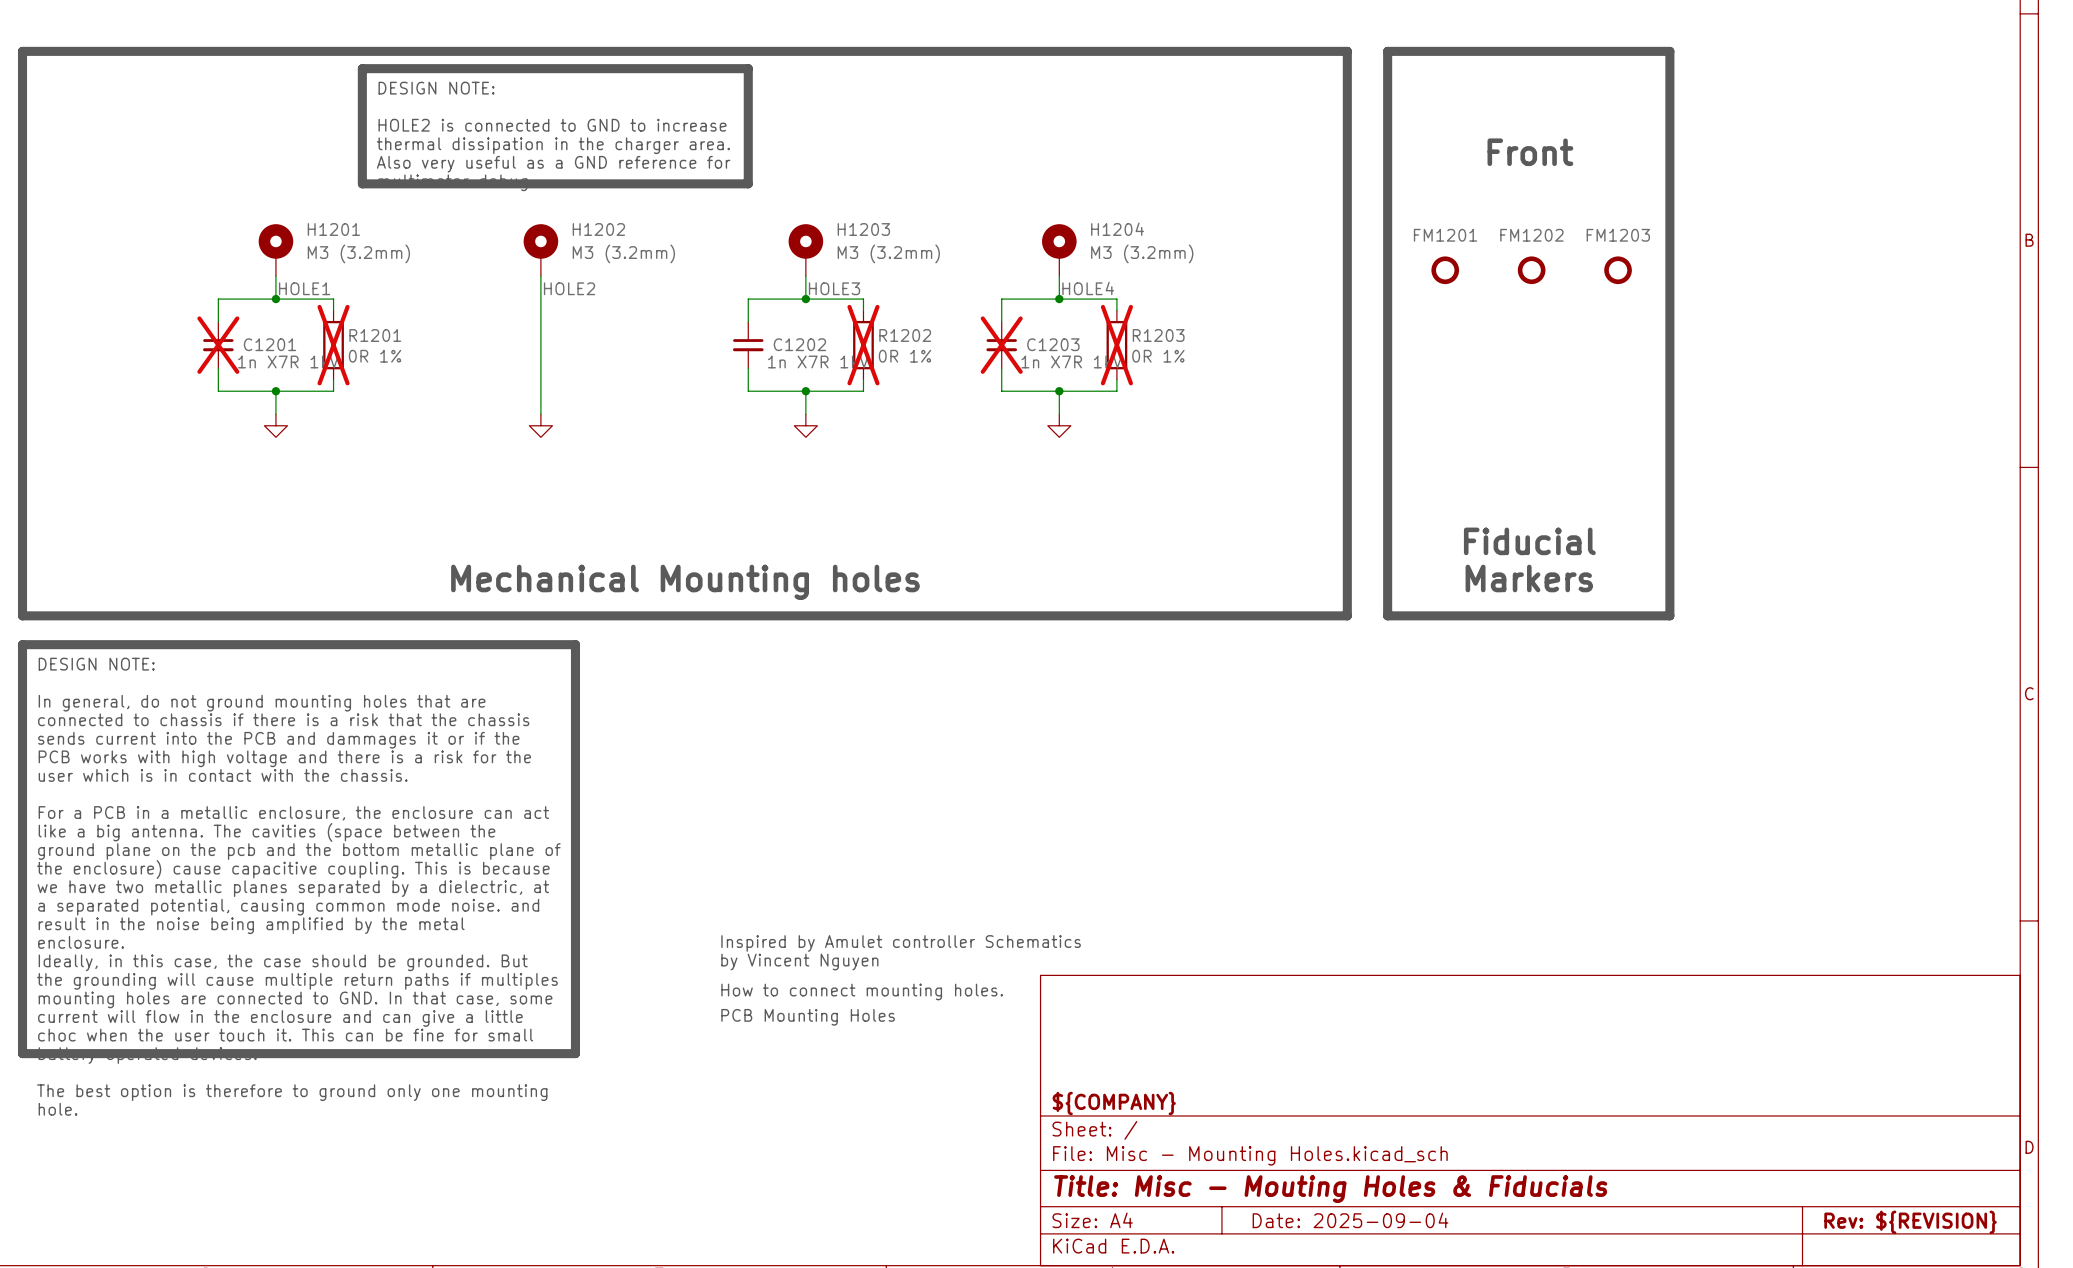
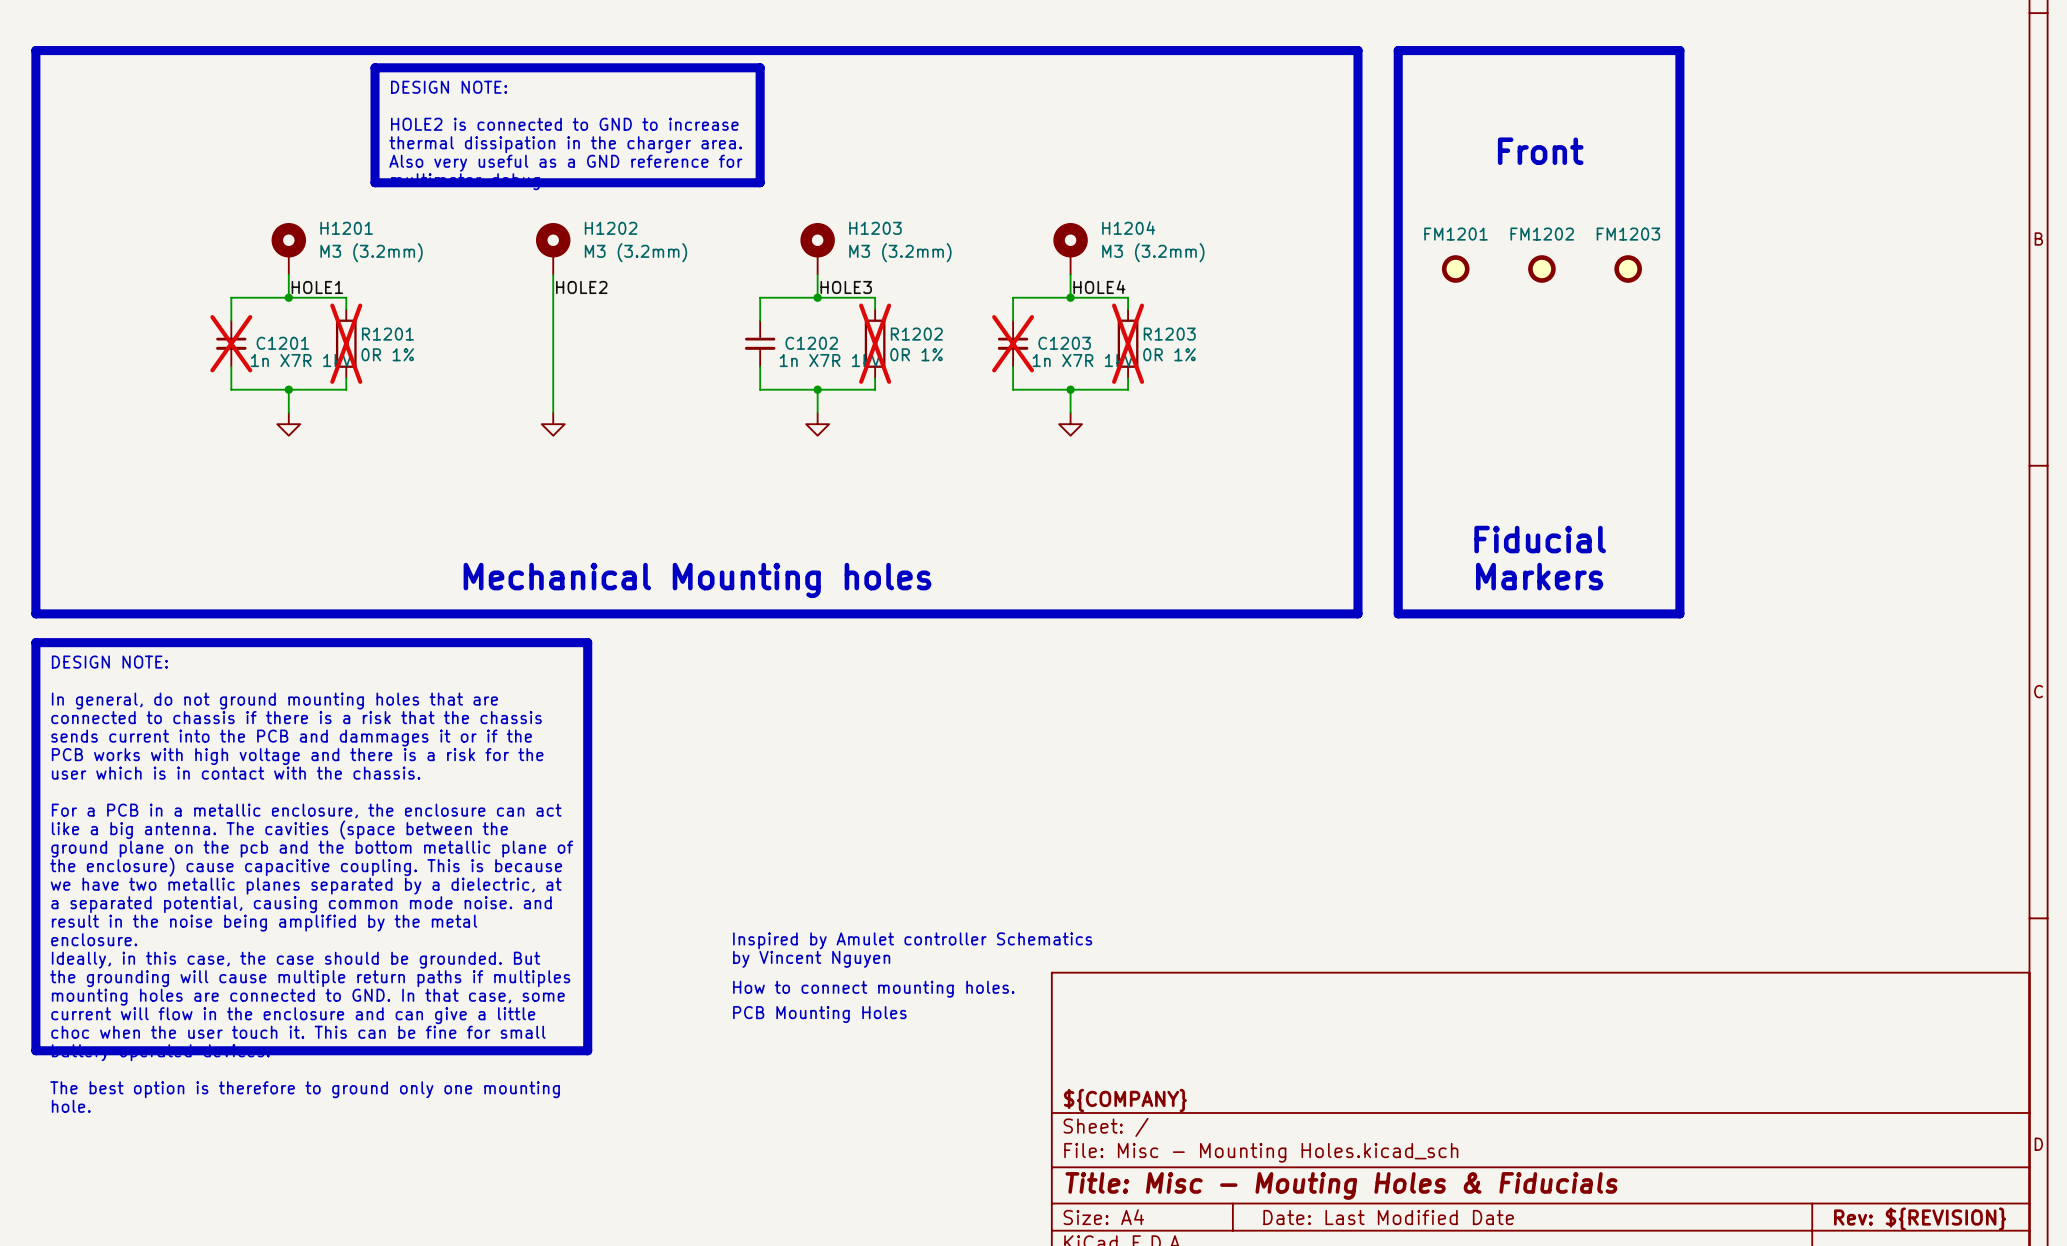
title block: Date: 2025-09-04 (1350, 1220) -> Date: Last Modified Date (1388, 1217)

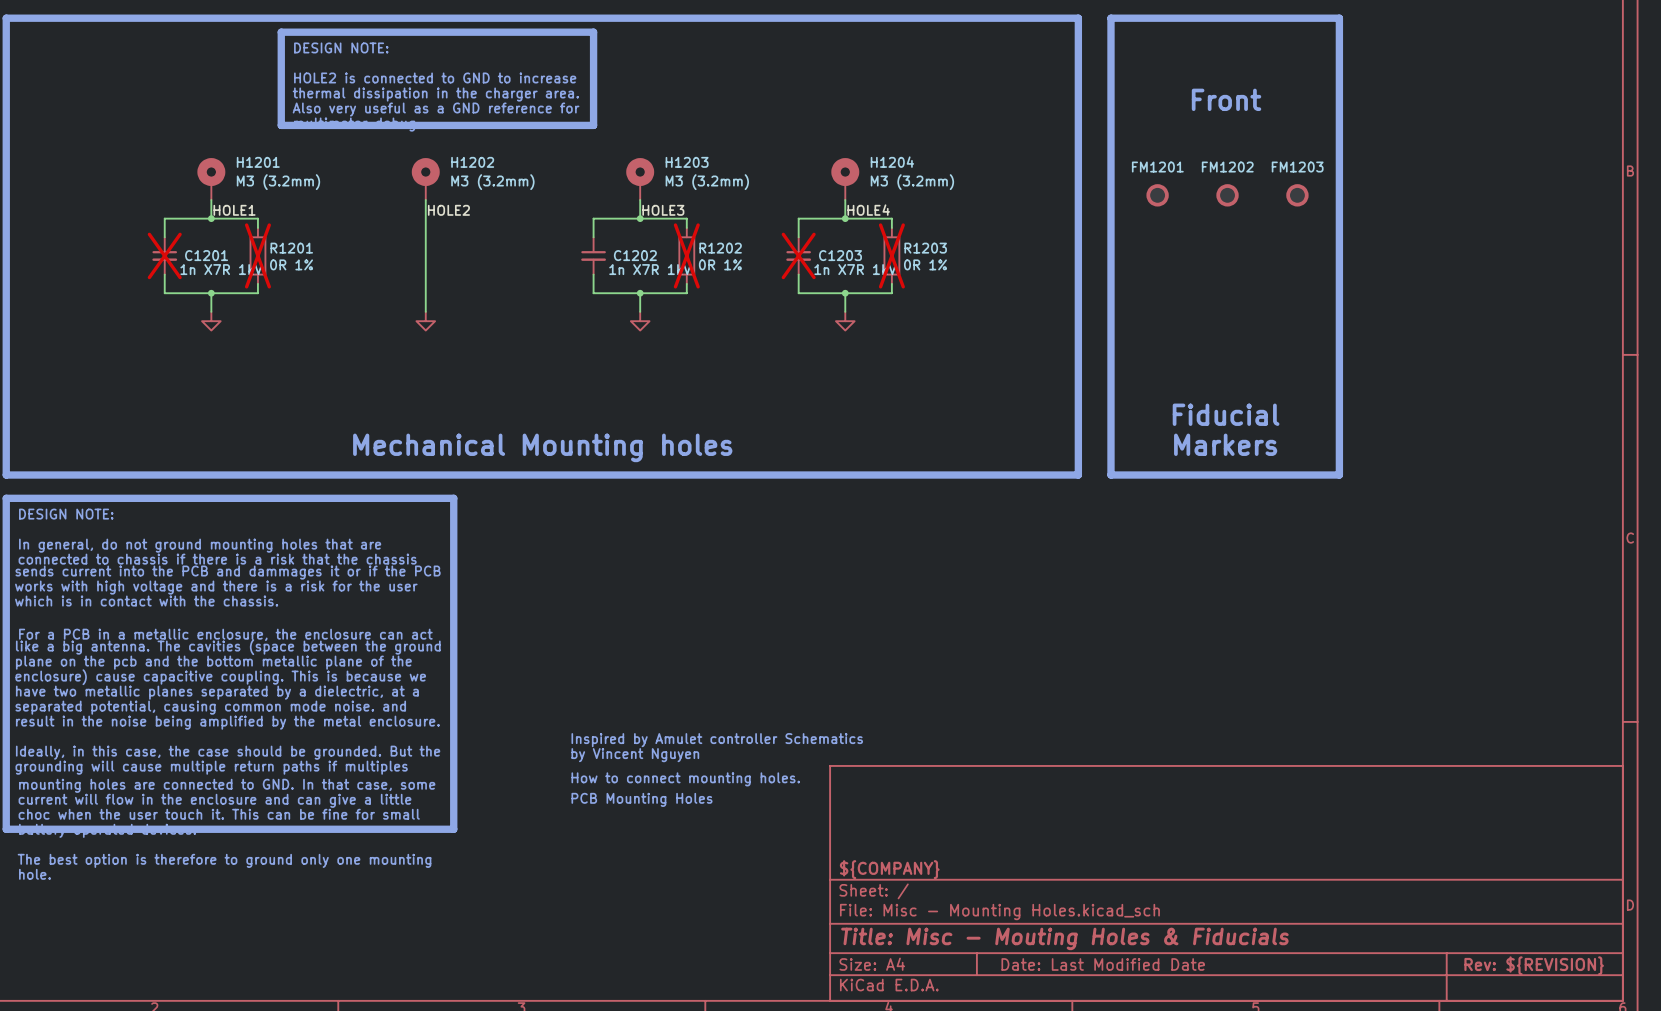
text: sends current into the PCB and dammages it or if the (291, 738) -> sends current into the PCB and dammages it or if the PCB (228, 572)
text: PCB works with high voltage and there is a risk for the (297, 756) -> works with high voltage and there is a risk for the user (216, 587)
text: user which is in contact with the chassis. (236, 773) -> which is in contact with the chassis. (146, 601)
text: like a big antenna. The cavities (space between the (279, 830) -> like a big antenna. The cavities (space between the ground (228, 647)
text: ground plane on the pcb and the bottom metallic plane of (312, 849) -> plane on the pcb and the bottom metallic plane of the (213, 662)
text: the enclosure) cause capacitive coupling. This is because (306, 867) -> enclosure) cause capacitive coupling. This is because we (220, 677)
text: we have two metallic planes separated by a dielectric, at (306, 886) -> have two metallic planes separated by a dielectric, at a (217, 692)
text: a separated potential, causing common mode noise. and (301, 904) -> separated potential, causing common mode noise. and (210, 707)
text: result in the noise being amplified by the metal (264, 923) -> result in the noise being amplified by the metal enclosure. (227, 722)
text: enclosure. (94, 939) -> none
text: Ideally, in this case, the case should be grounded. But (296, 960) -> Ideally, in this case, the case should be grounded. But the (228, 752)
text: the grounding will cause multiple return paths if multiples (310, 978) -> grounding will cause multiple return paths if multiples (211, 767)

